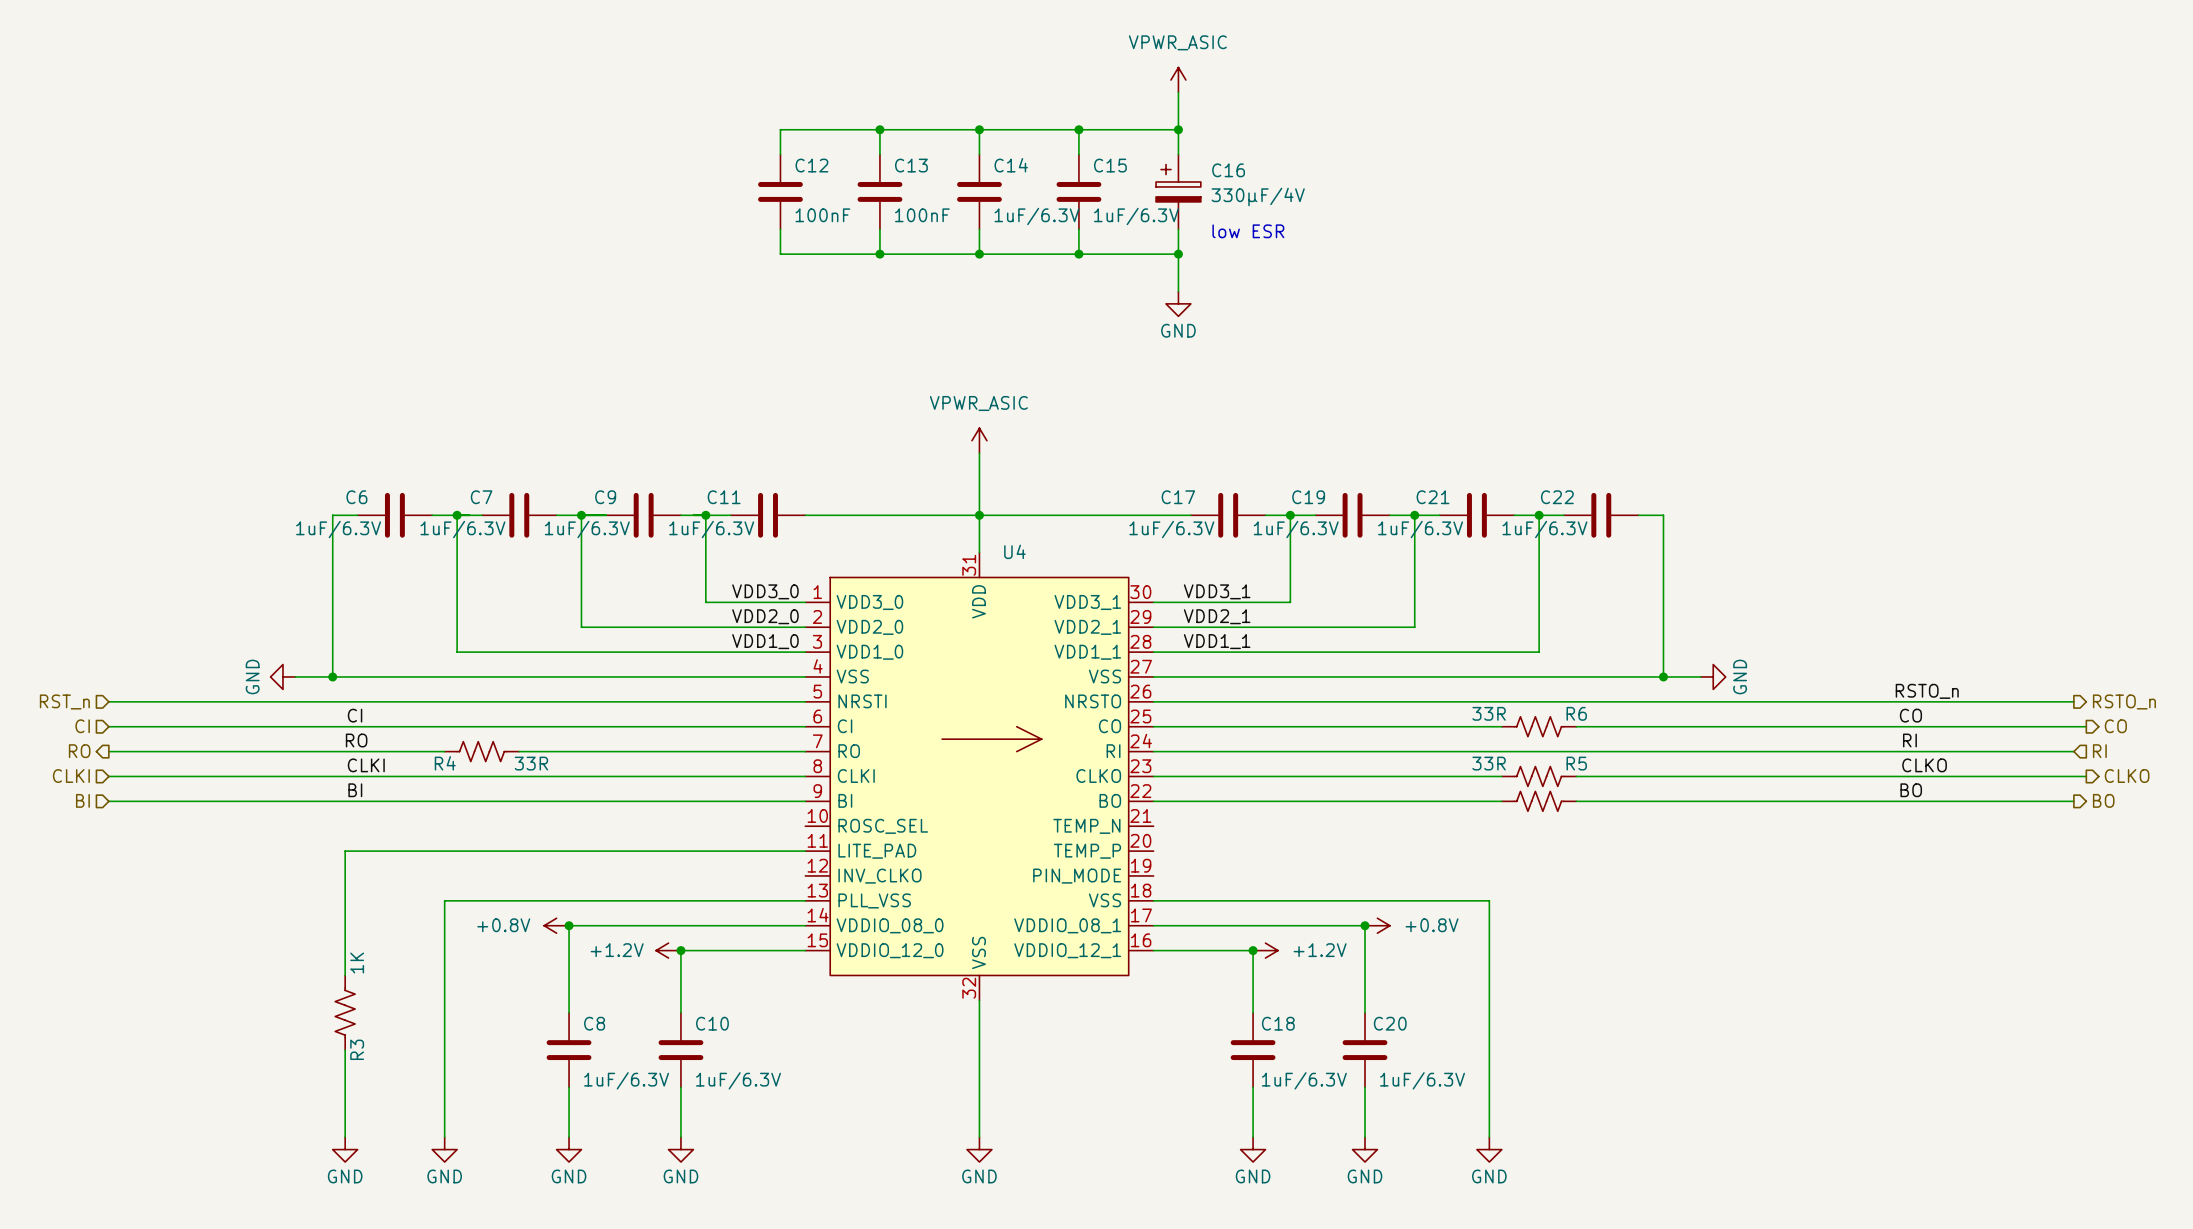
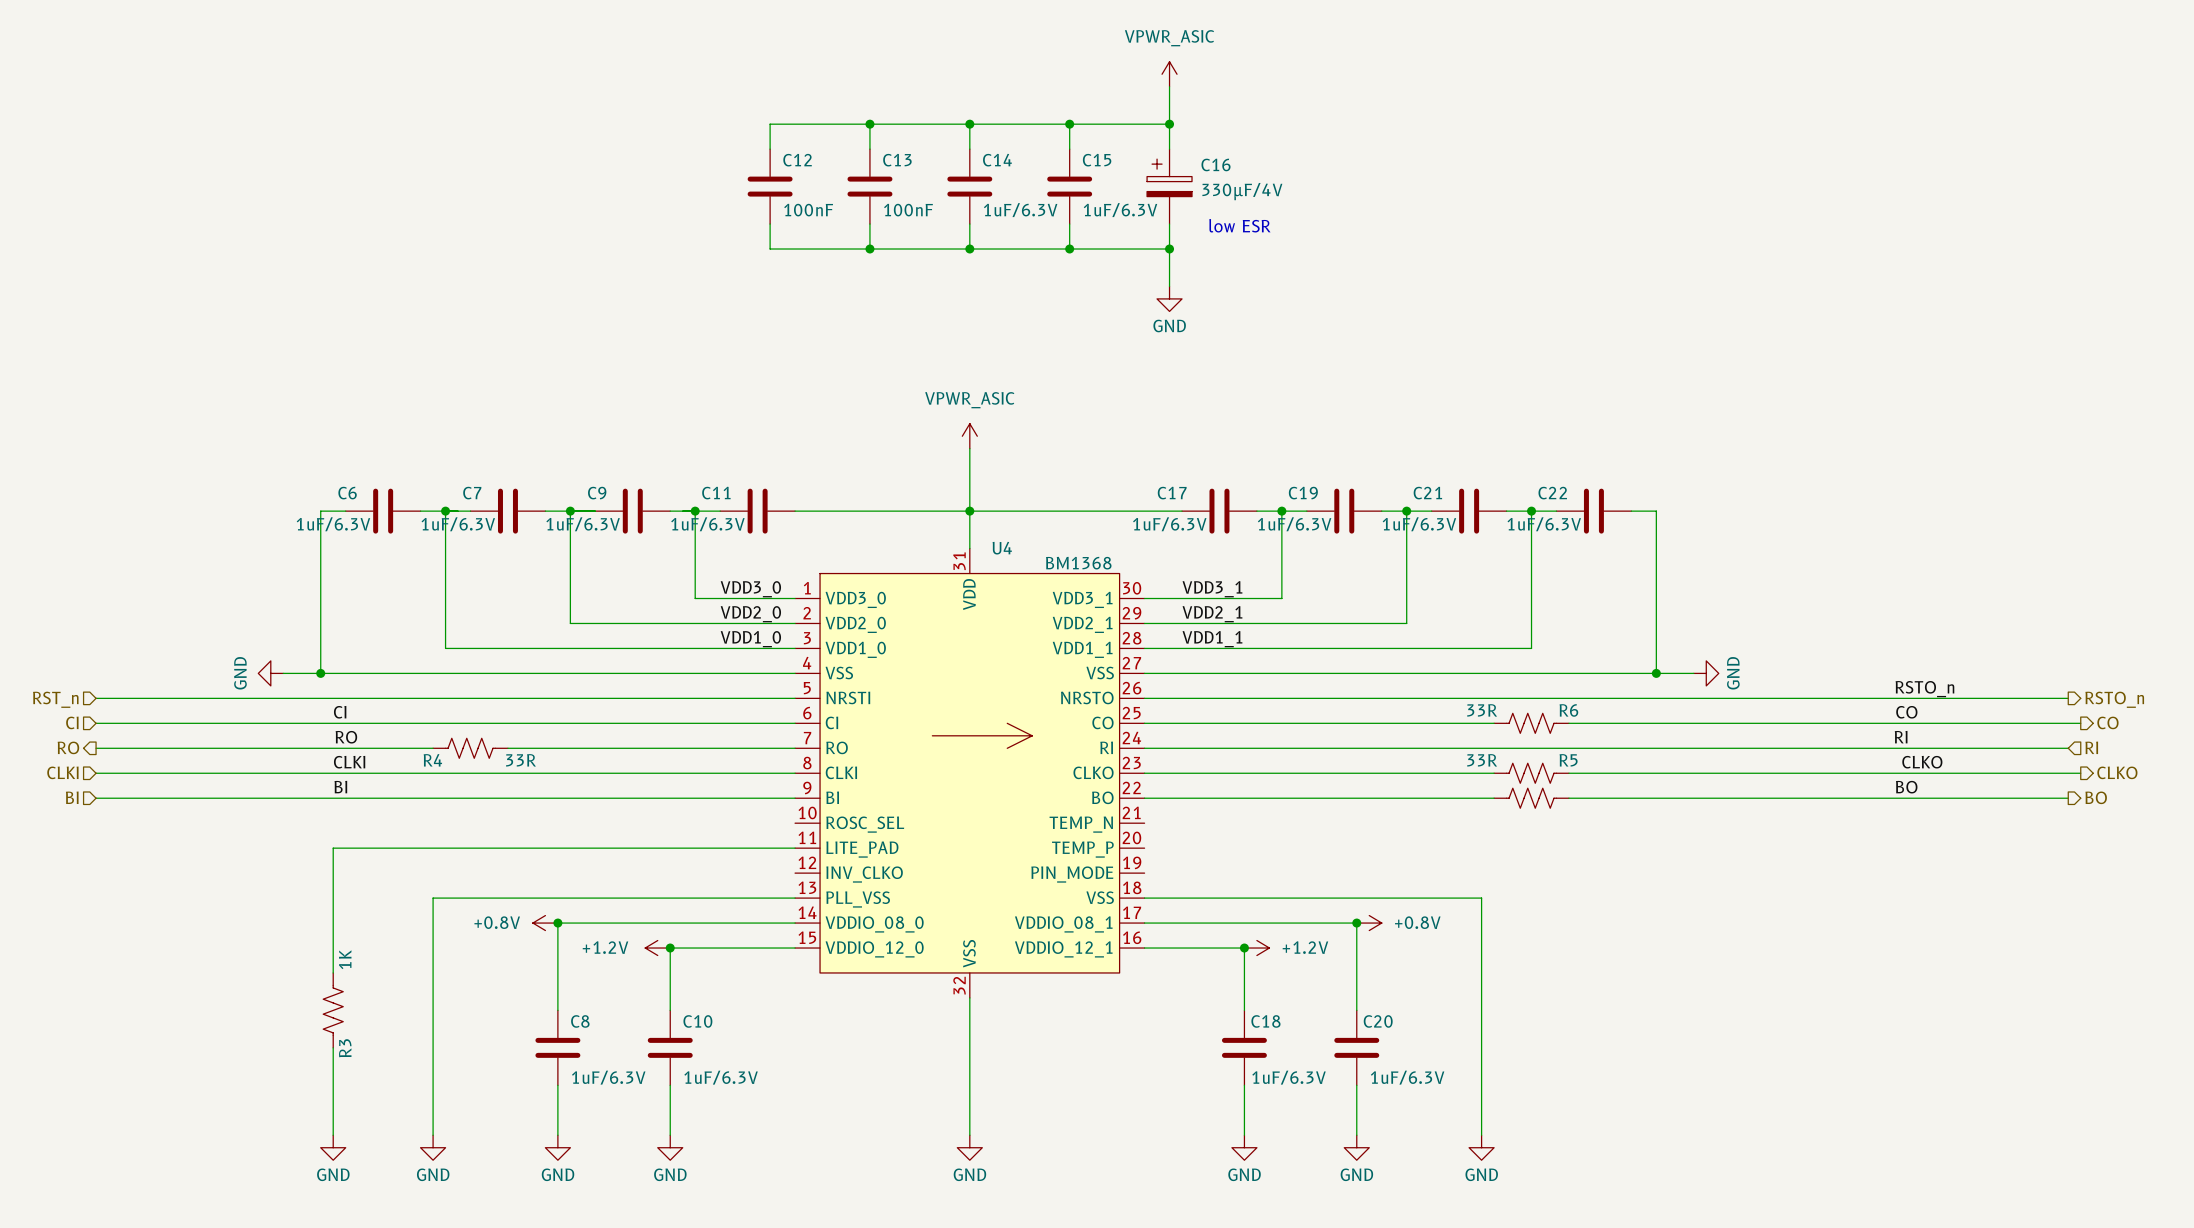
U4 value: none -> BM1368 (1078, 563)

